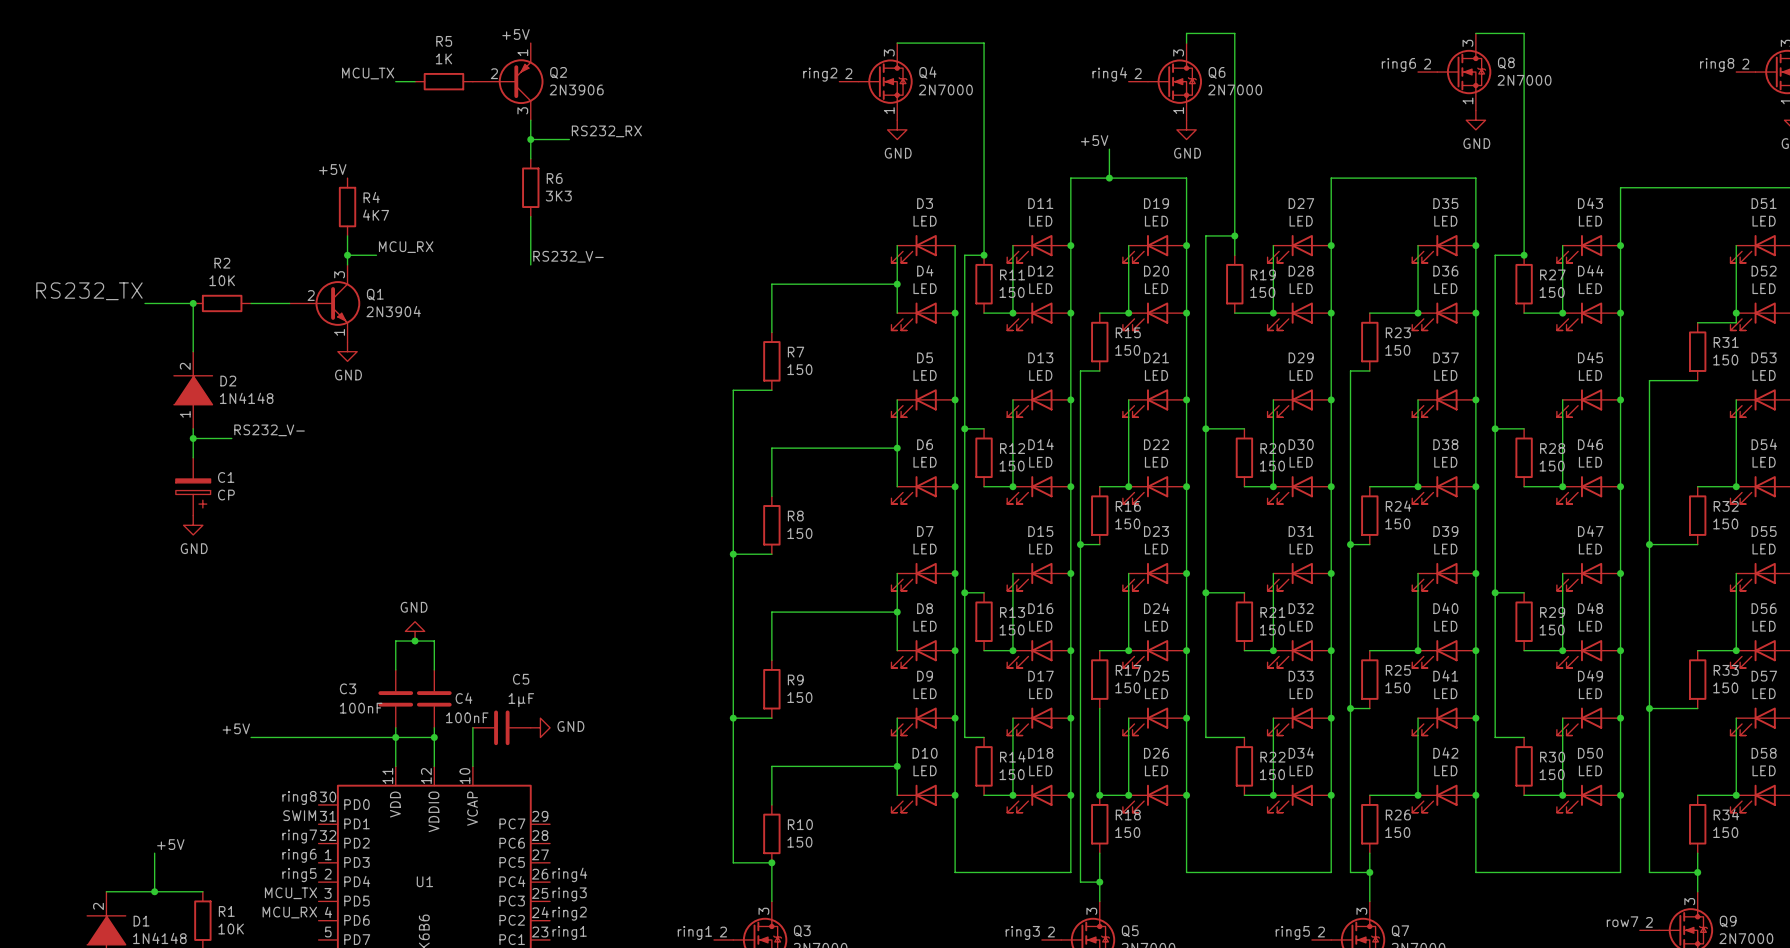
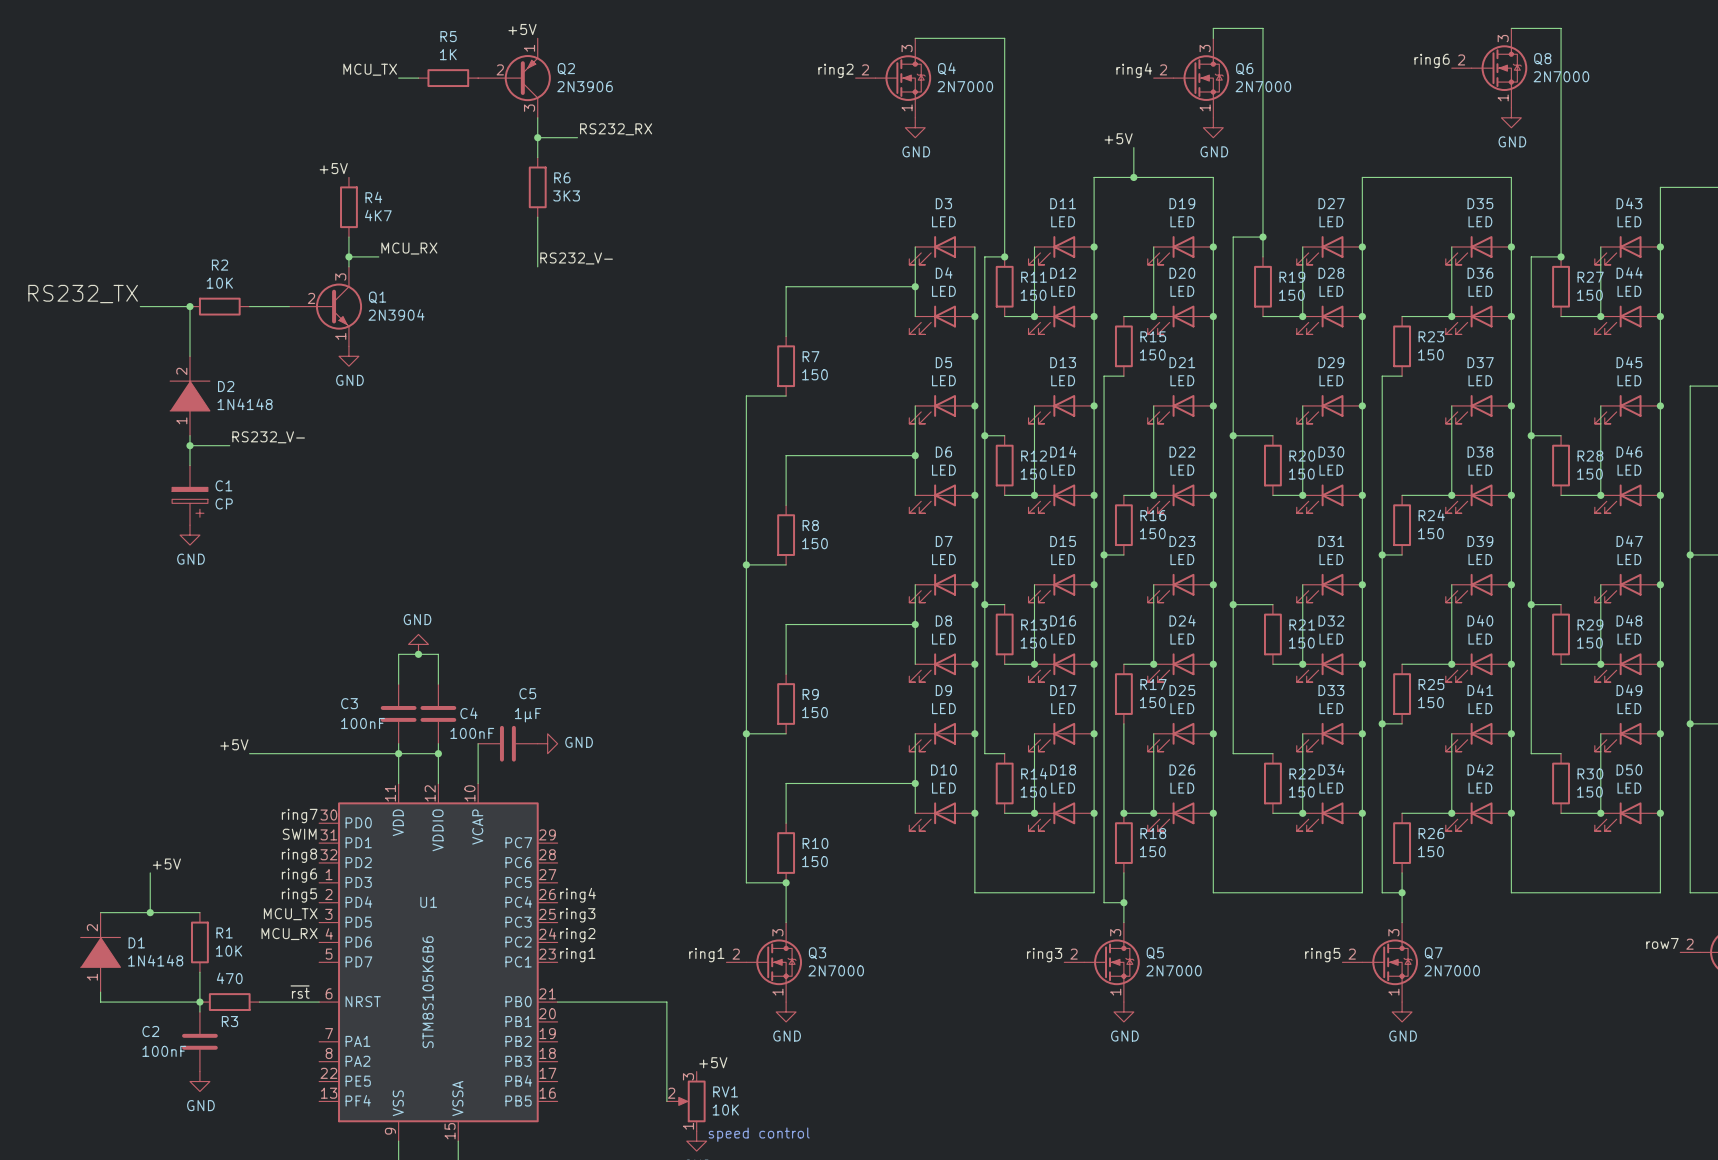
label: ring8 (299, 797) -> ring7 (299, 816)
label: ring7 (299, 836) -> ring8 (299, 855)

